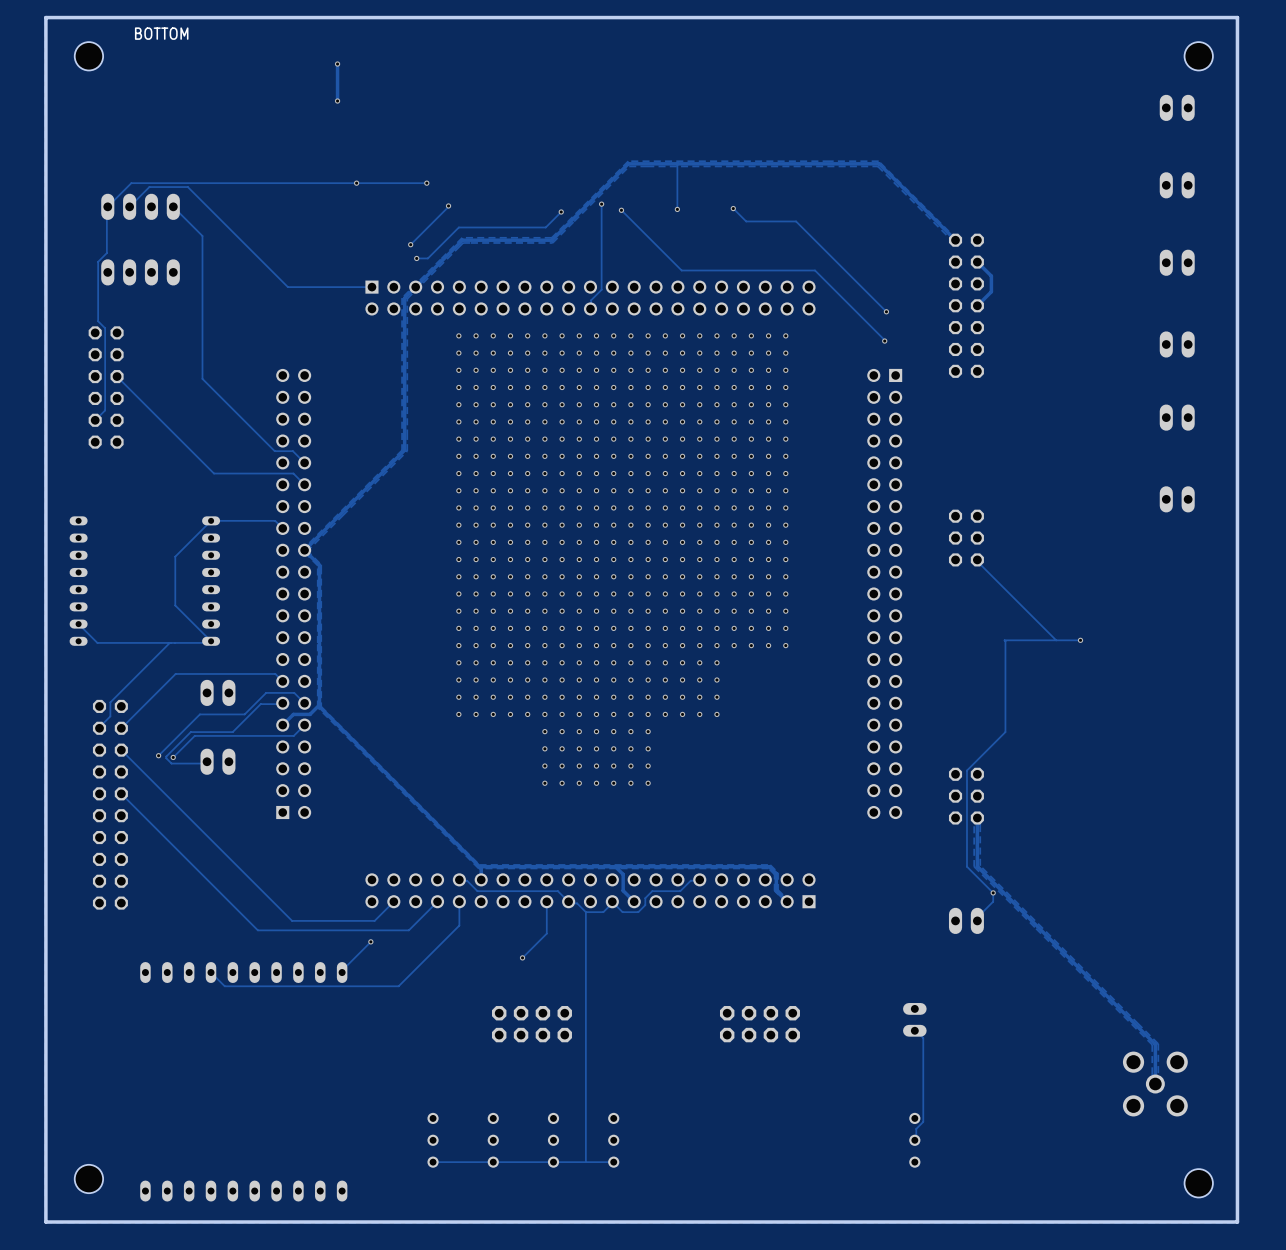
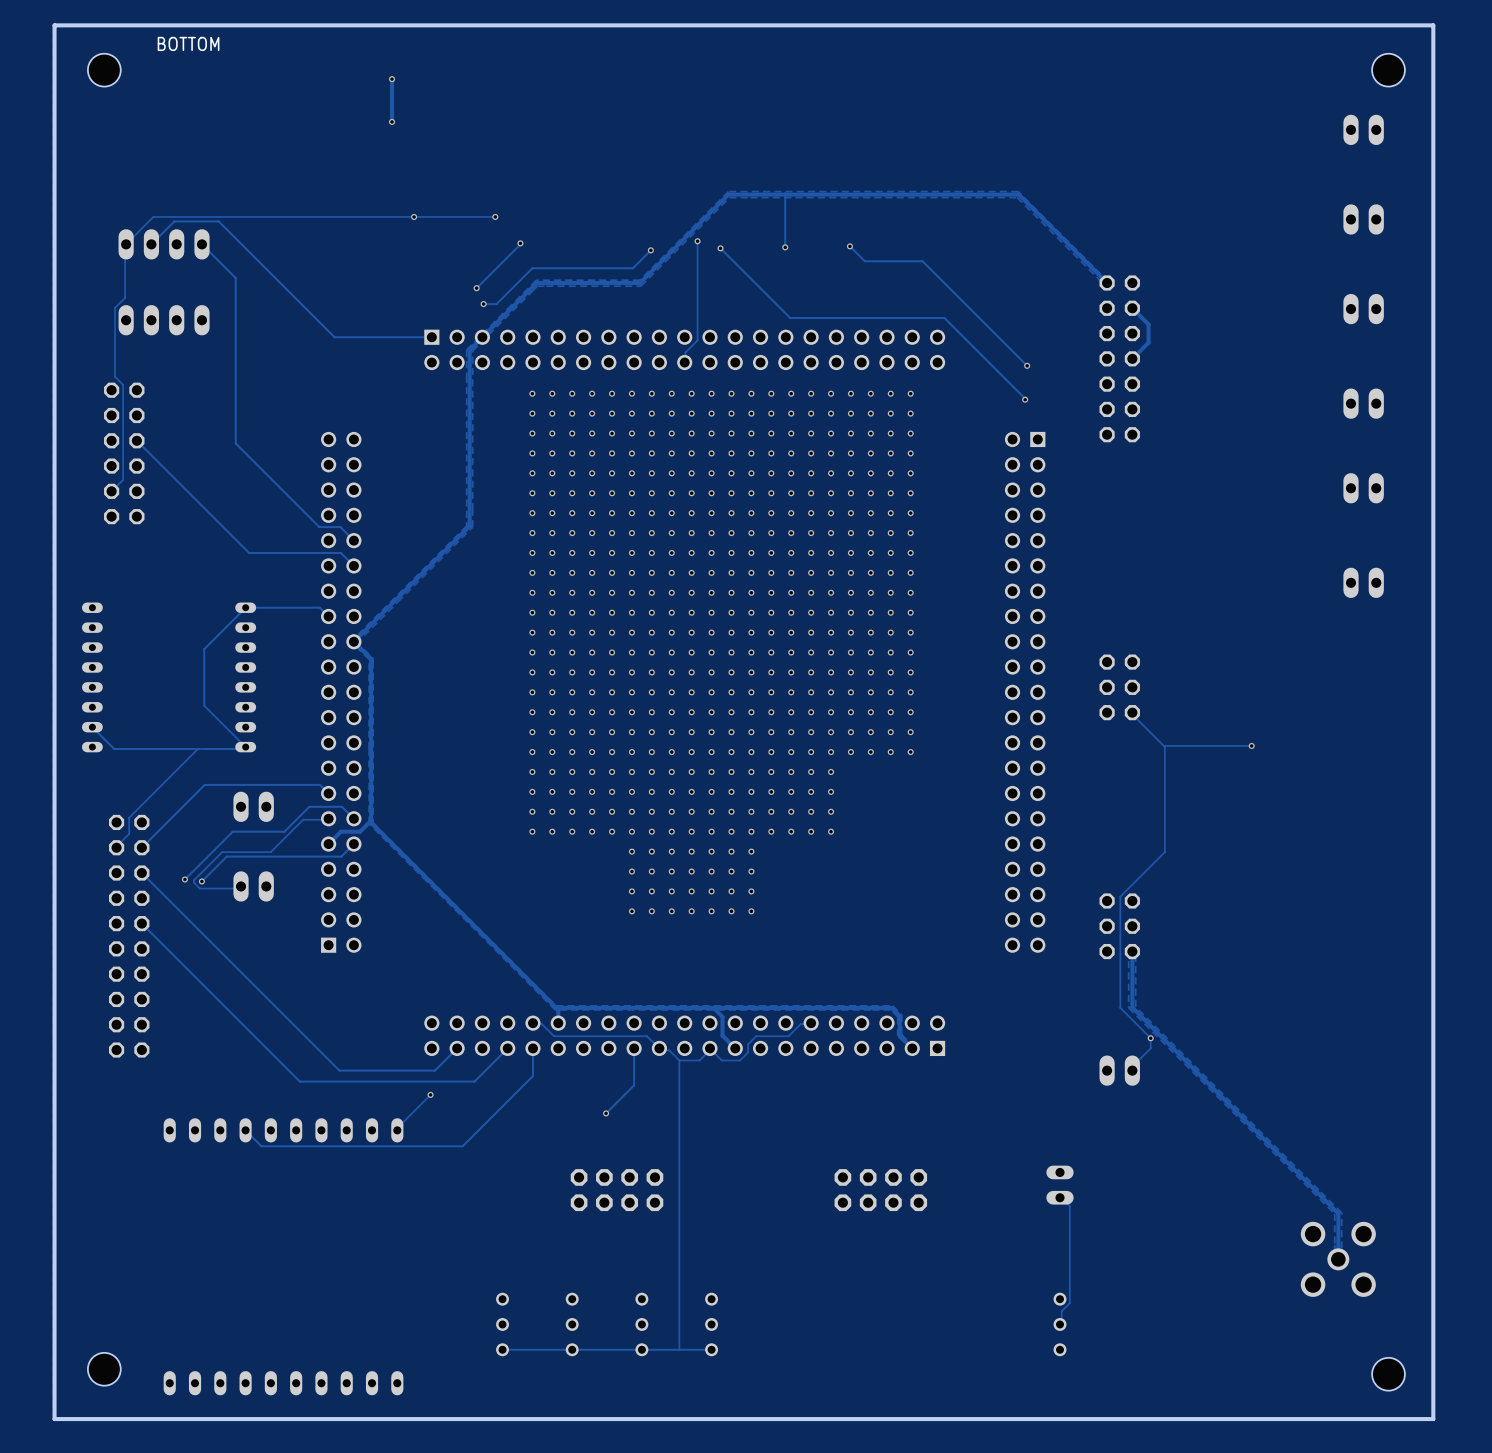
part position: (966, 538) -> (1119, 687)
track: (977, 559) (1056, 640) -> none
track: none -> (1132, 712) (1163, 745)

